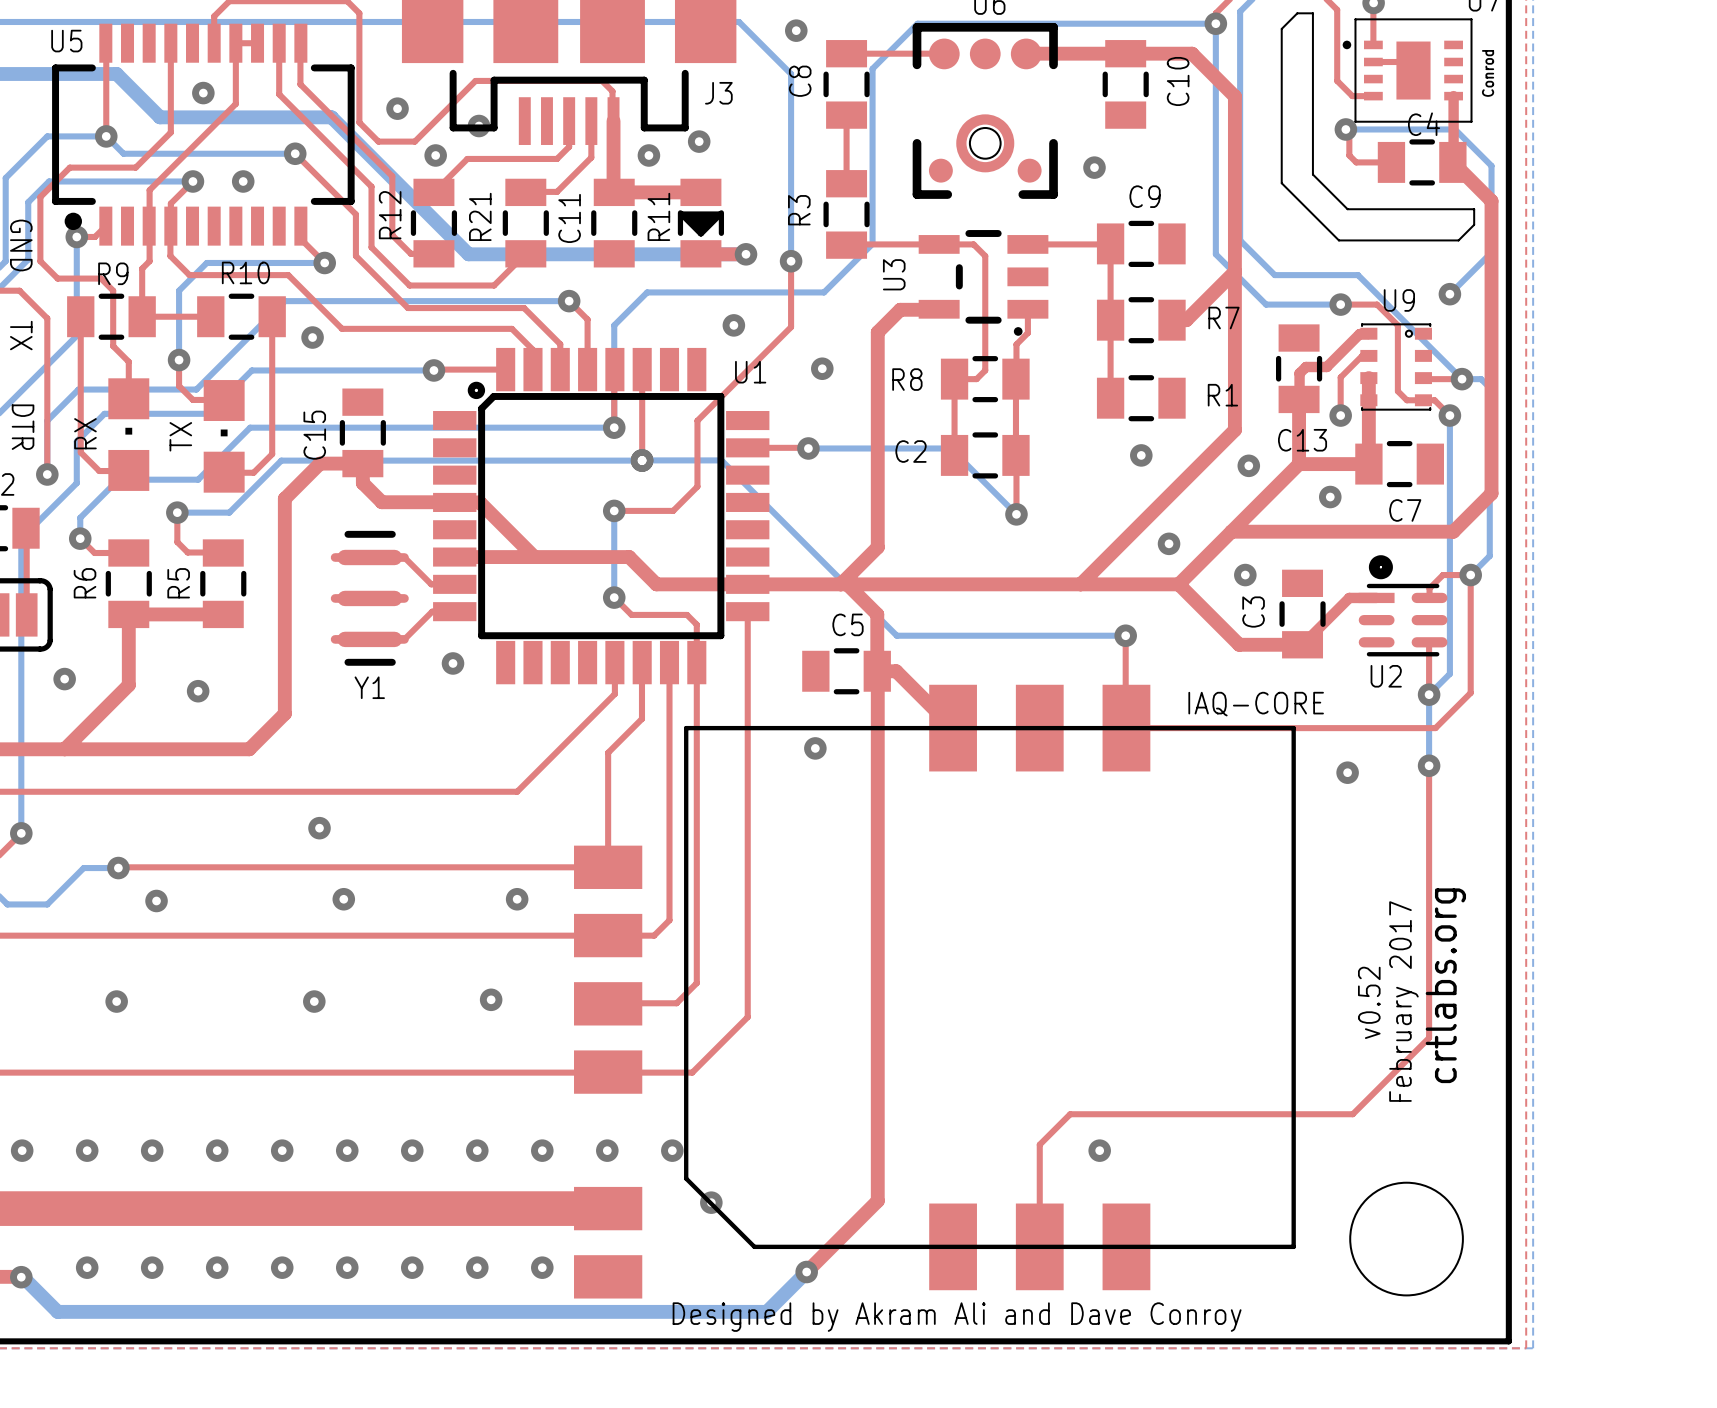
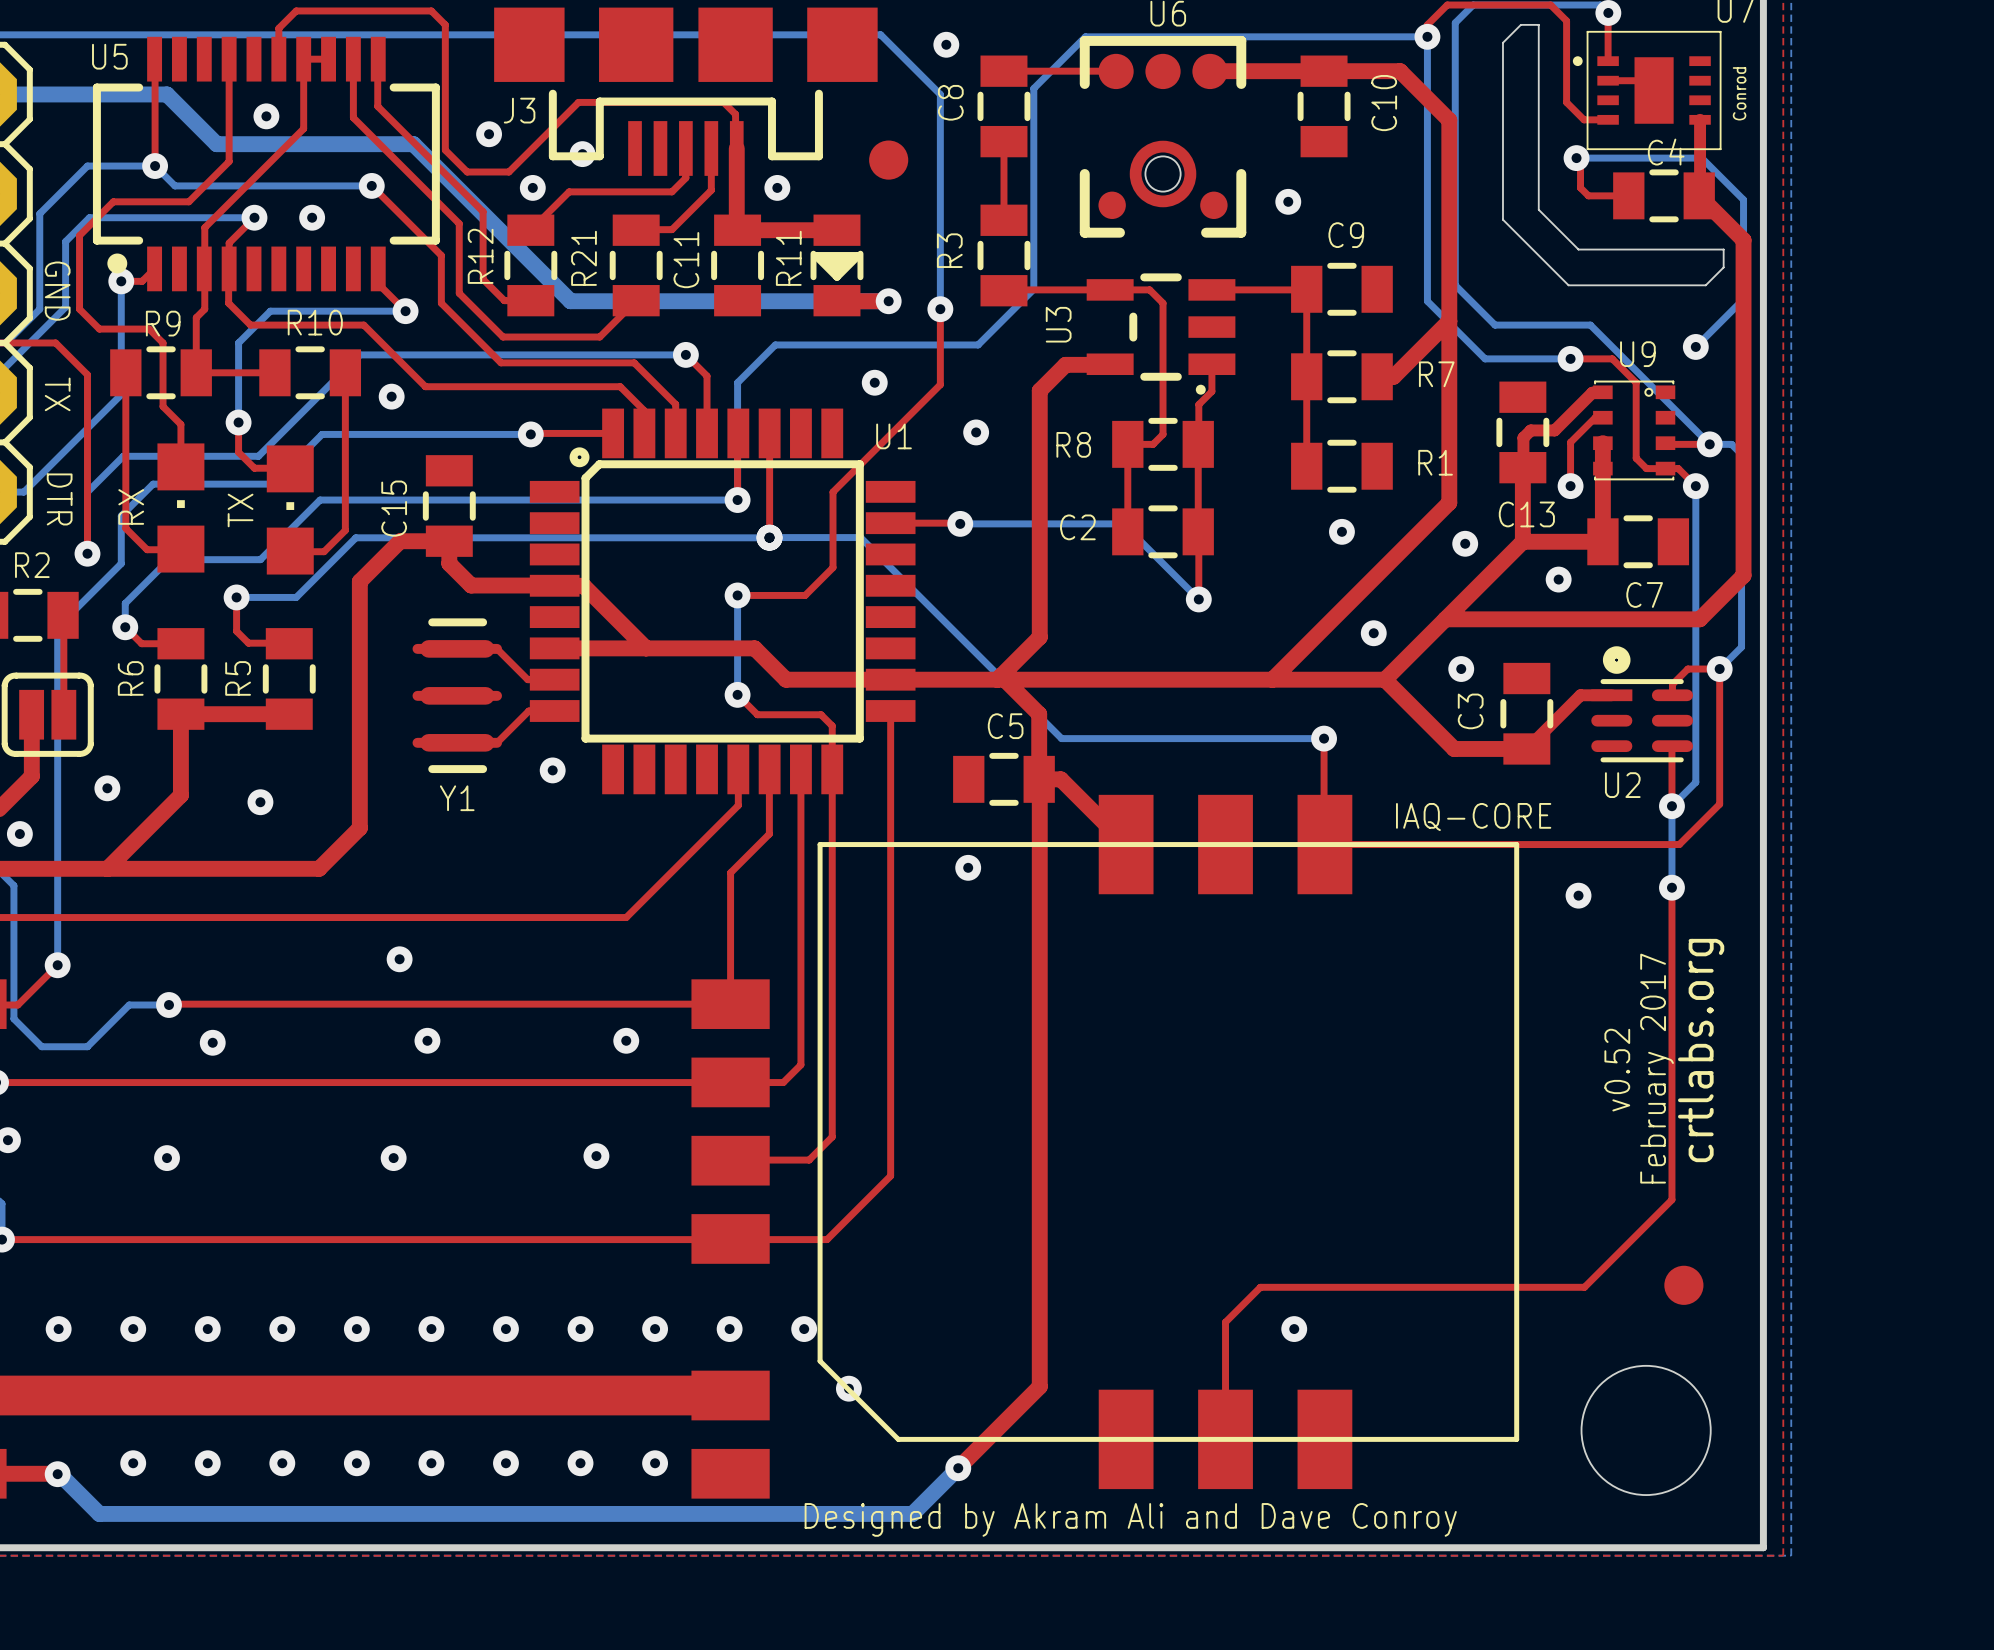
J3 name position: J3 (718, 93) -> J3 (519, 110)
part: none -> (888, 160)
via: (699, 141) -> none
text position: crtlabs.org (1445, 985) -> crtlabs.org (1701, 1050)
text position: February 2017 (1403, 1001) -> February 2017 (1657, 1068)
text position: v0.52 (1369, 1002) -> v0.52 (1617, 1070)
part: none -> (1683, 1285)

